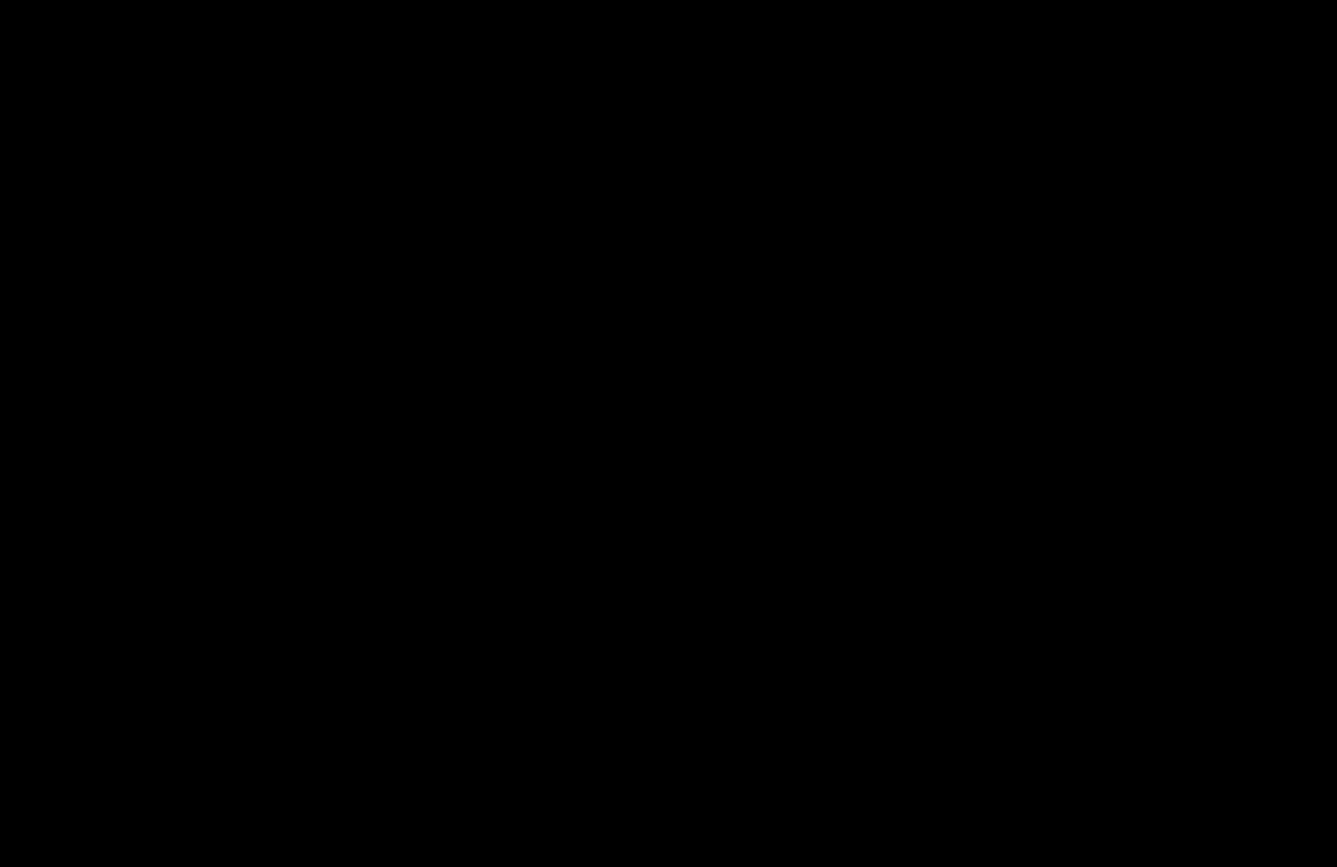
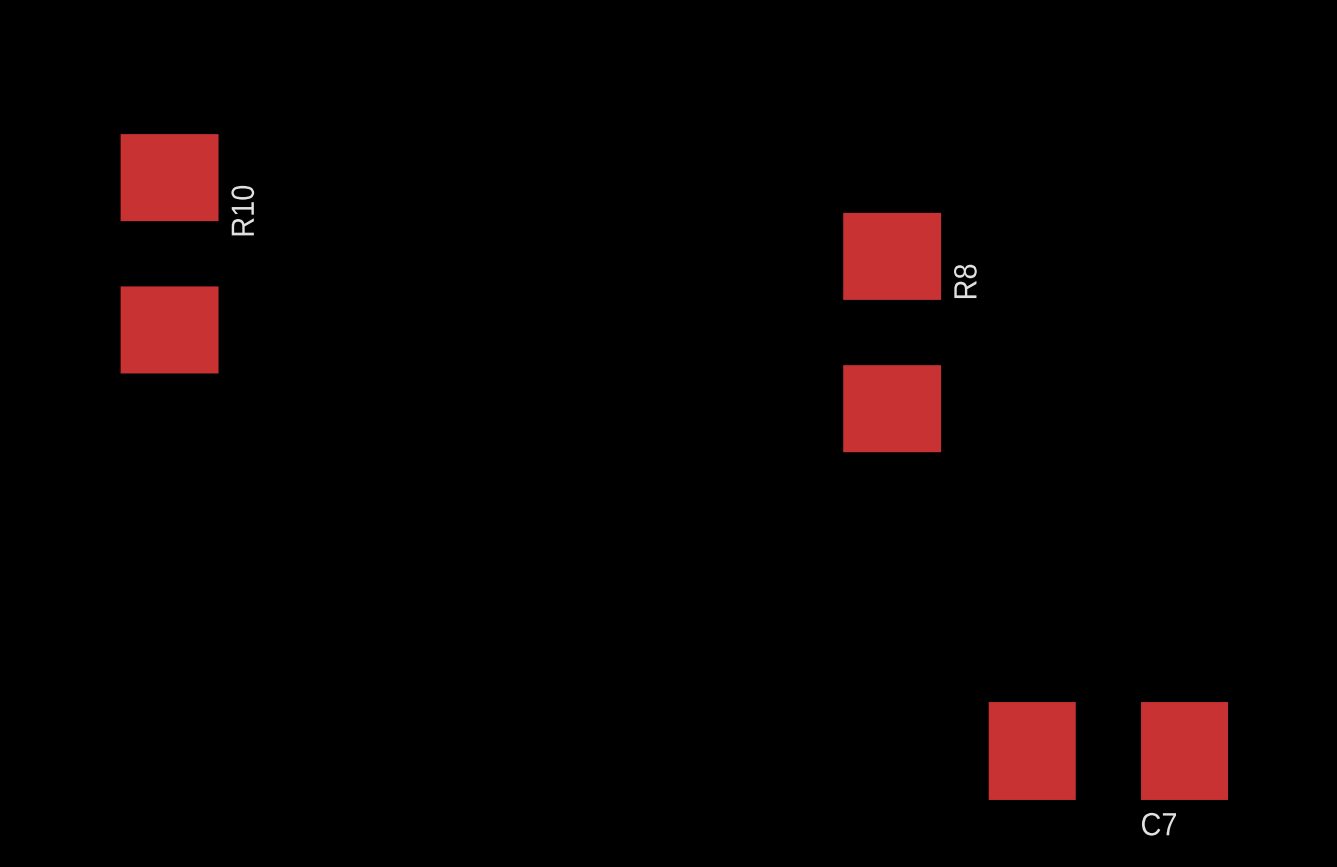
R10: none -> (169, 253)
R8: none -> (892, 332)
C7: none -> (1108, 751)

